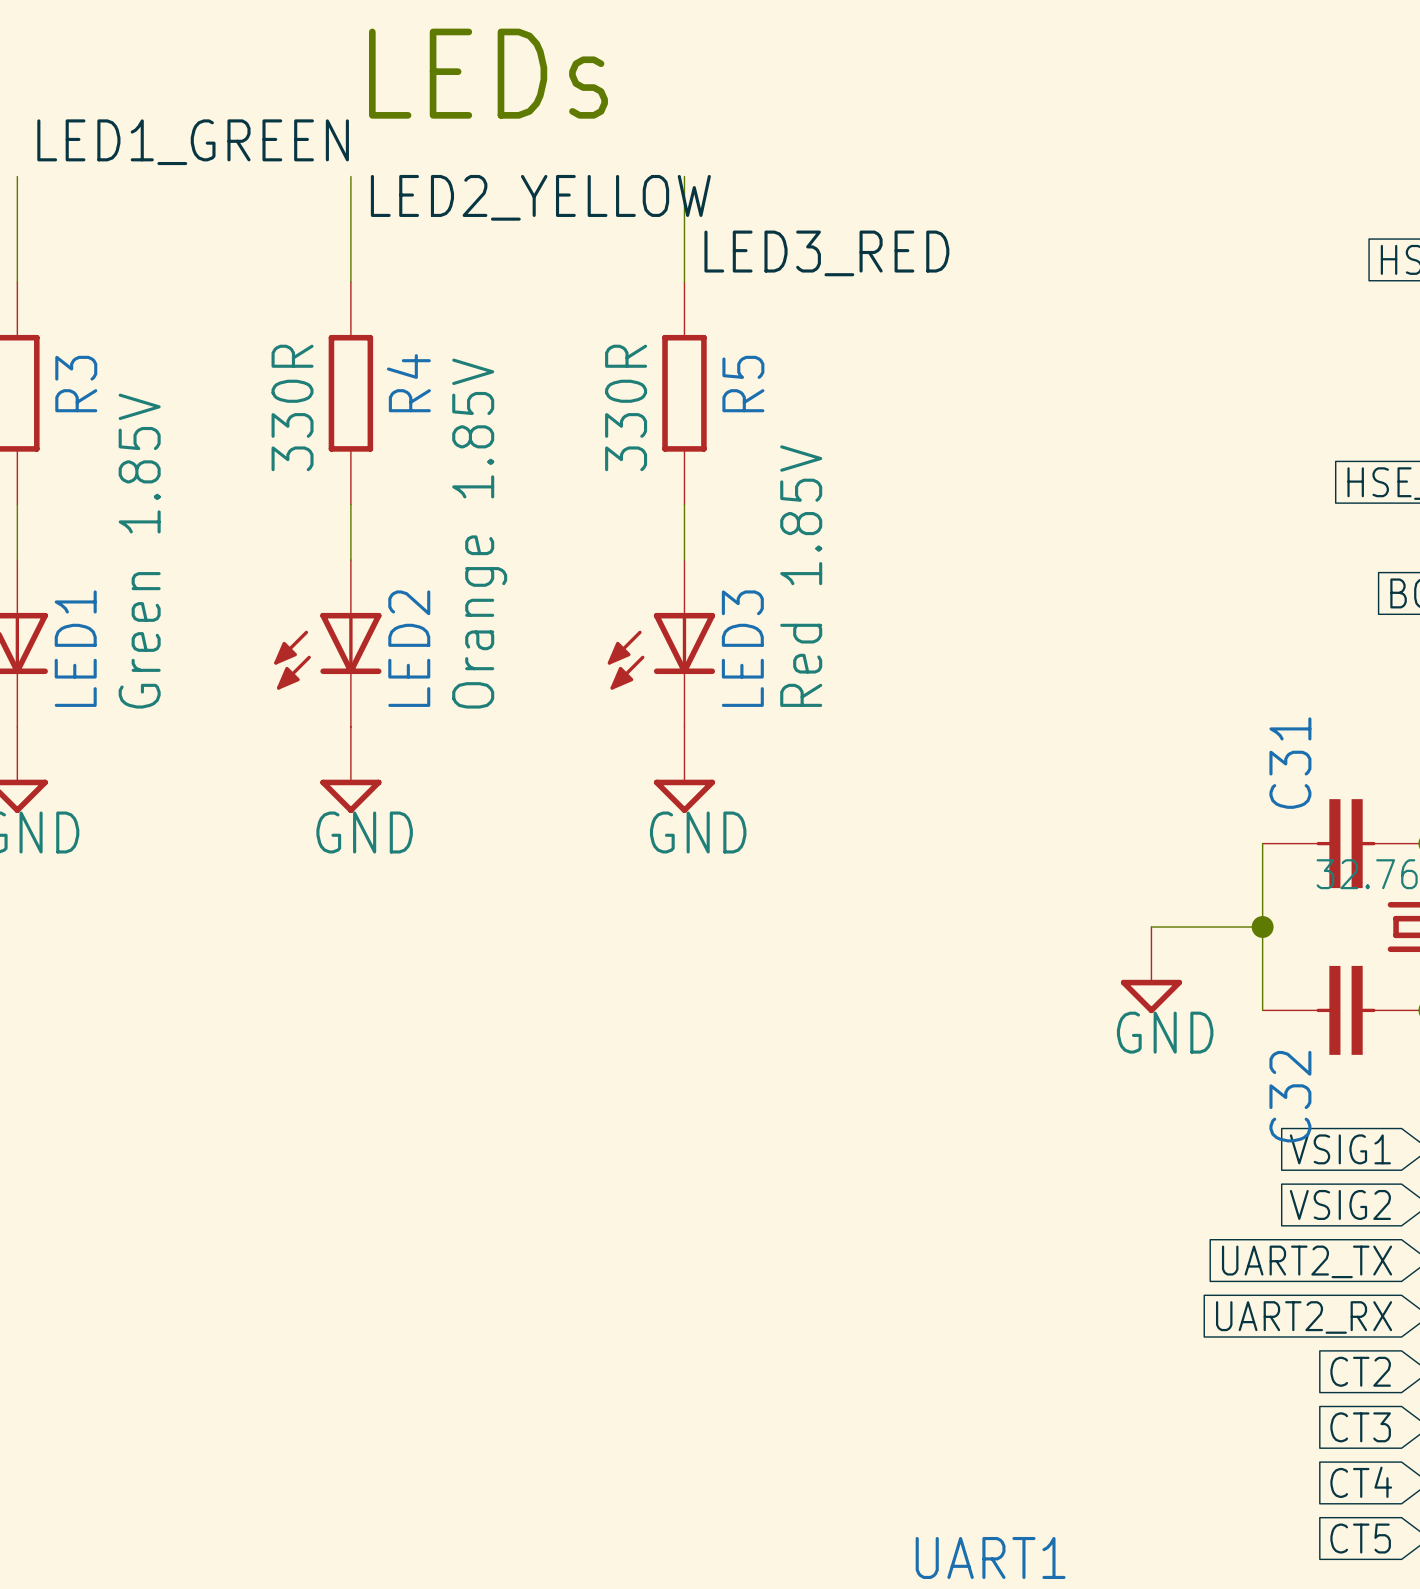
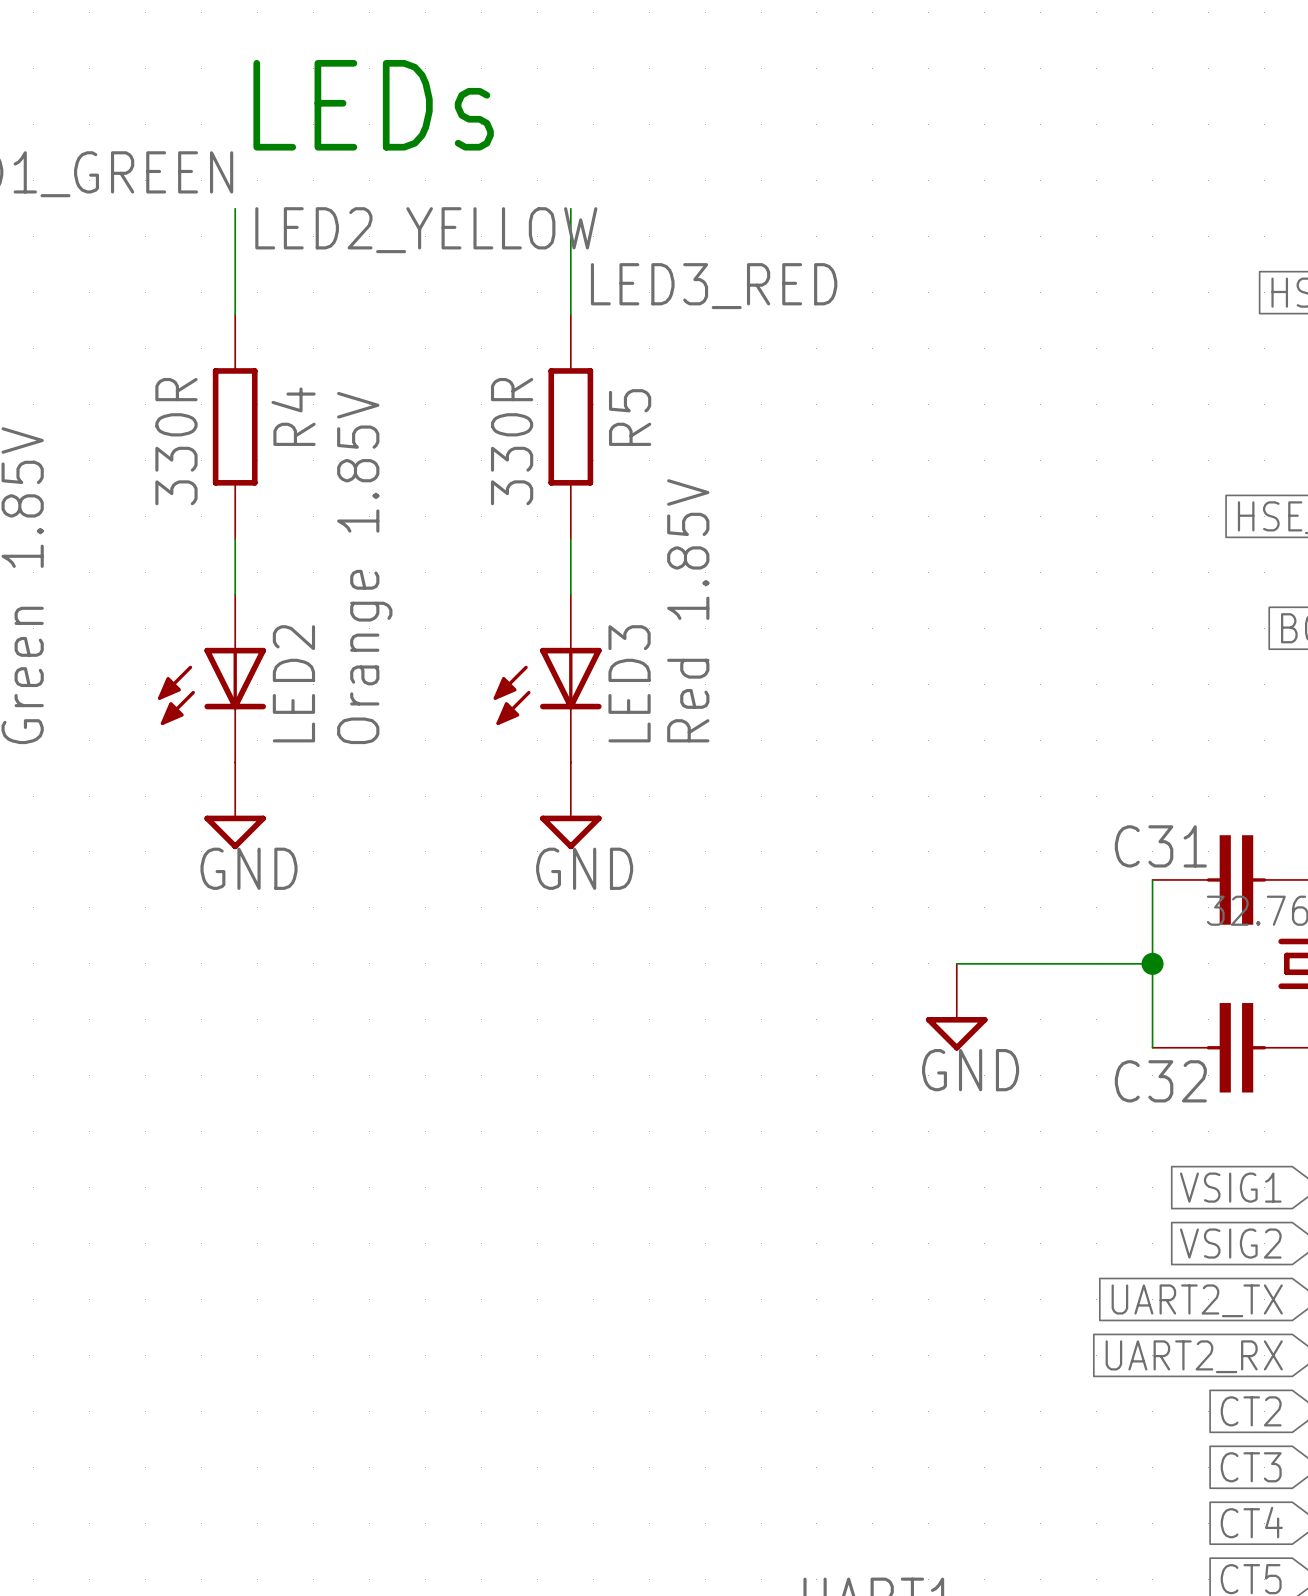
C31 name rotation: 0° (1290, 763) -> 90° clockwise (1160, 846)
wire: none -> (956, 963) (1040, 963)
power symbol position: GND (1151, 970) -> GND (956, 1007)
C32 name rotation: 0° (1290, 1096) -> 90° clockwise (1160, 1081)

